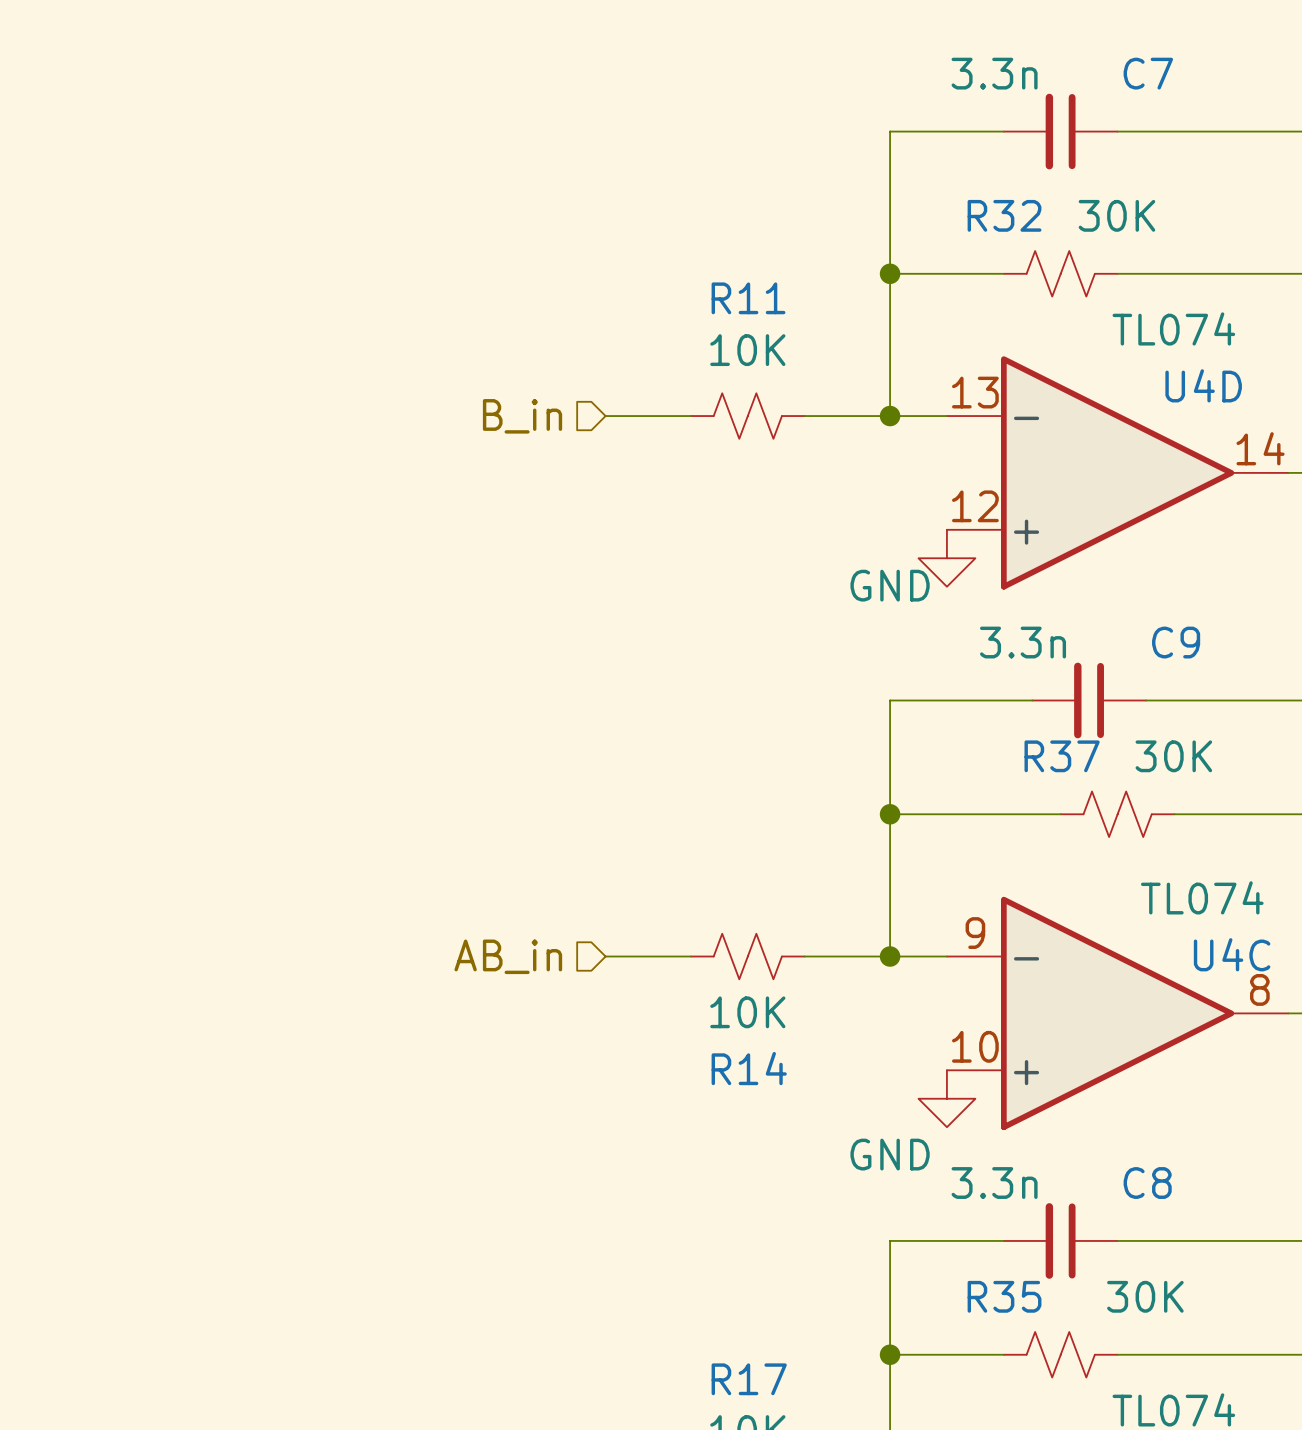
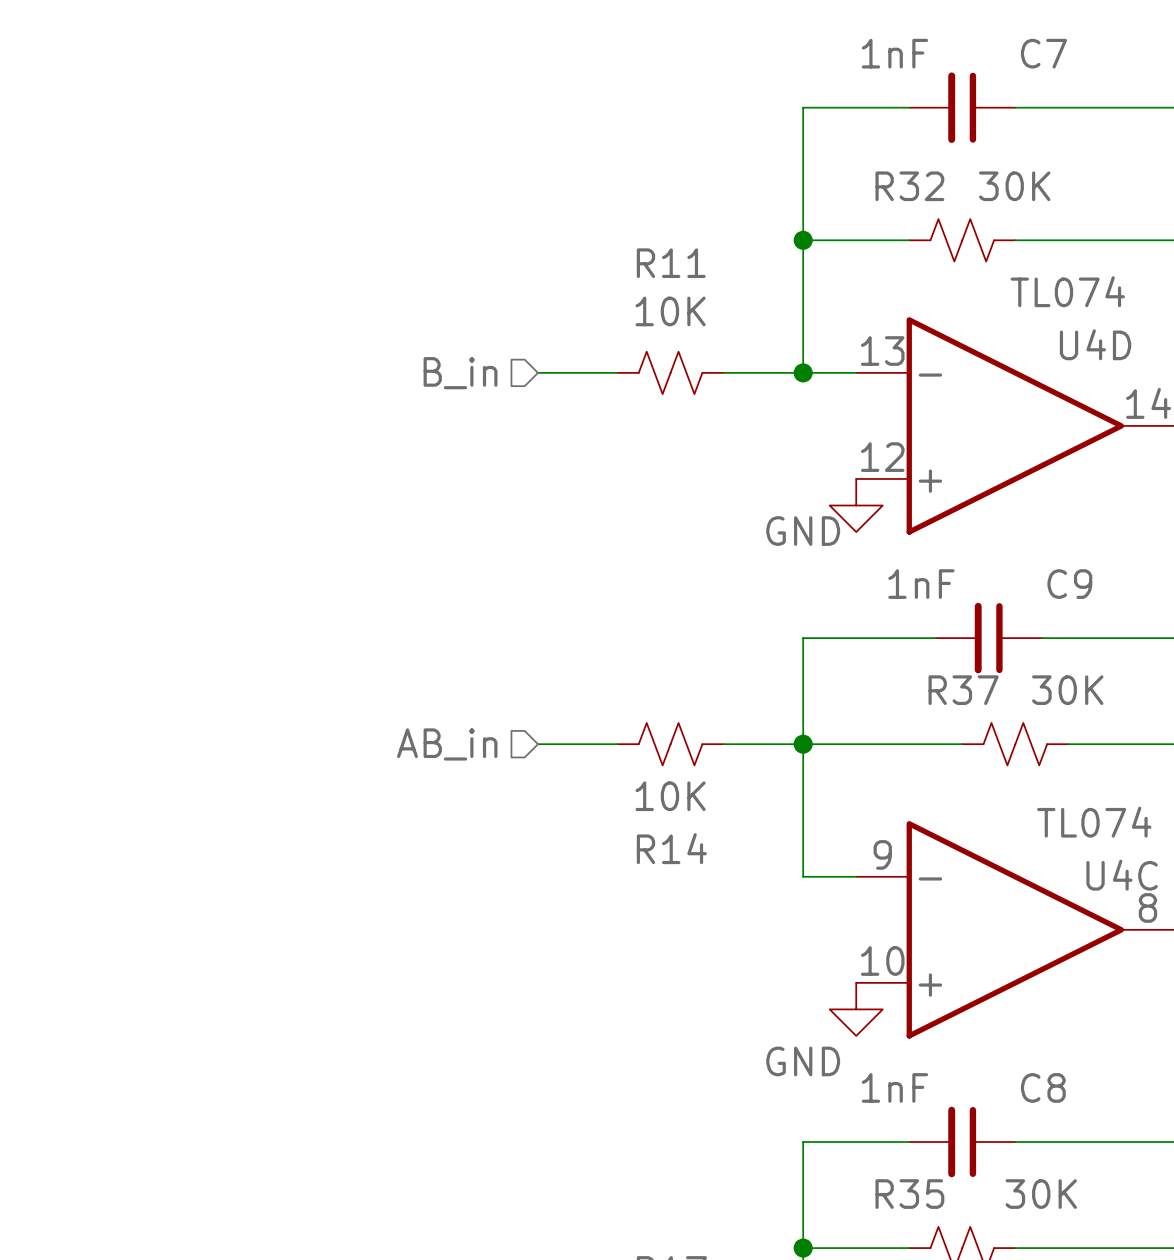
C7 value: 3.3n (994, 73) -> 1nF (894, 53)
C9 value: 3.3n (1023, 642) -> 1nF (921, 584)
hierarchical label position: AB_in (508, 956) -> AB_in (447, 744)
wire: (605, 956) (690, 956) -> (537, 744) (617, 744)
R14 position: (747, 956) -> (670, 744)
wire: (804, 956) (890, 956) -> (723, 744) (803, 744)
junction: (890, 956) -> none
C8 value: 3.3n (994, 1183) -> 1nF (894, 1087)

